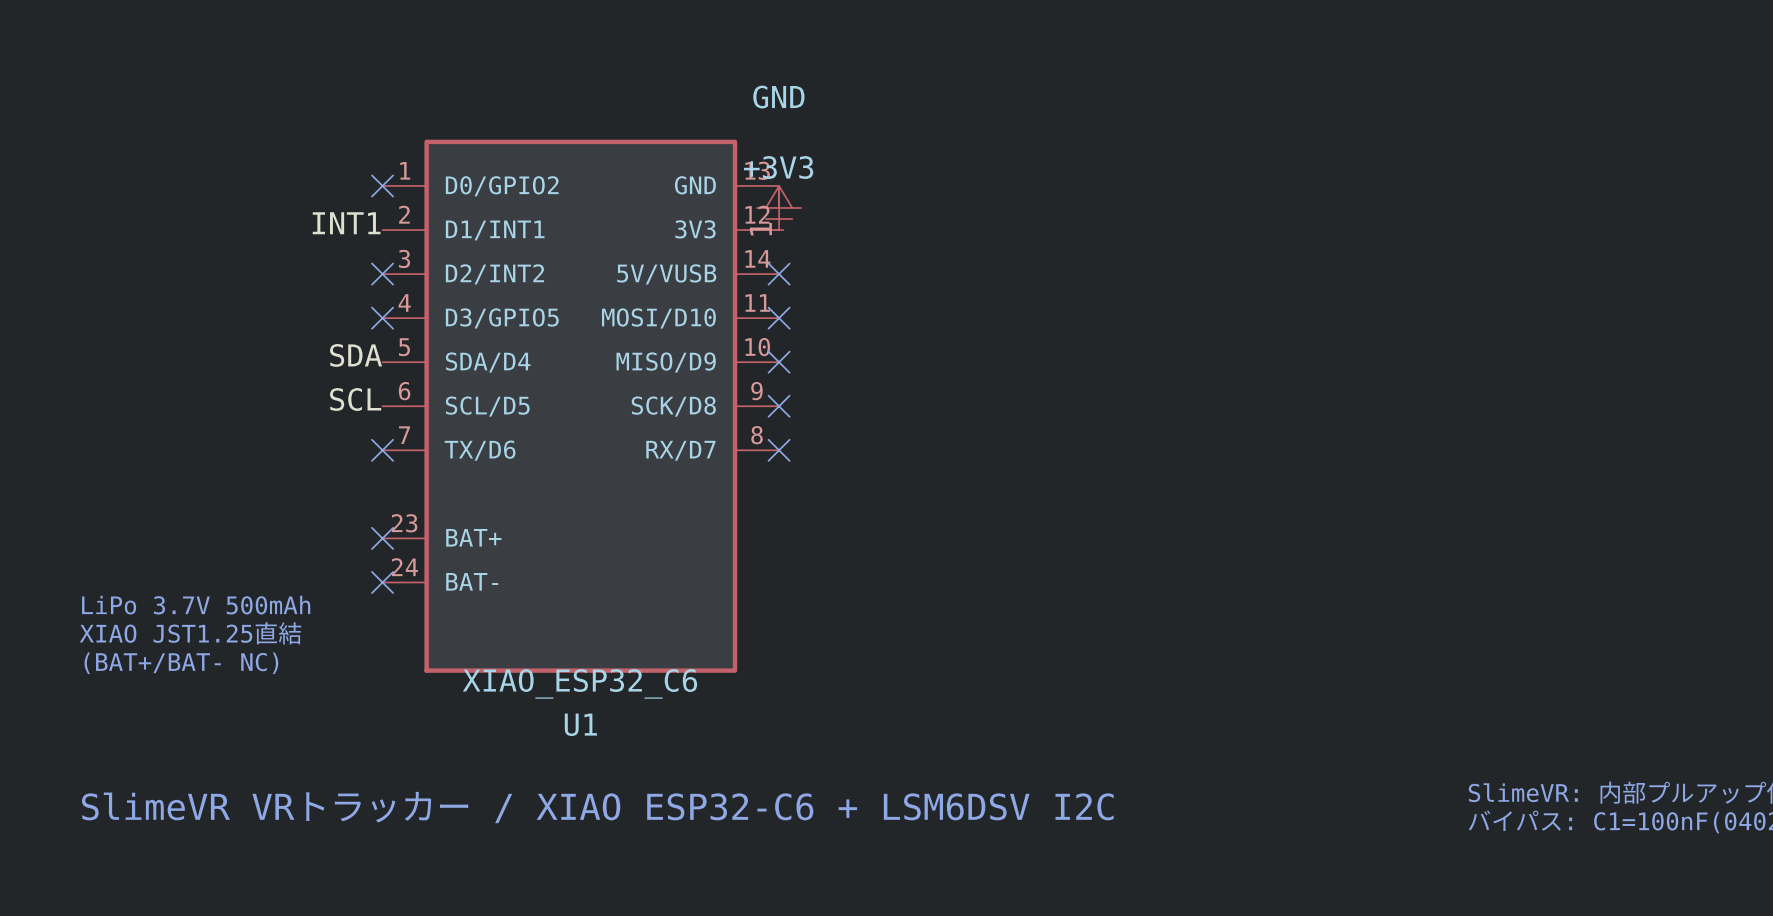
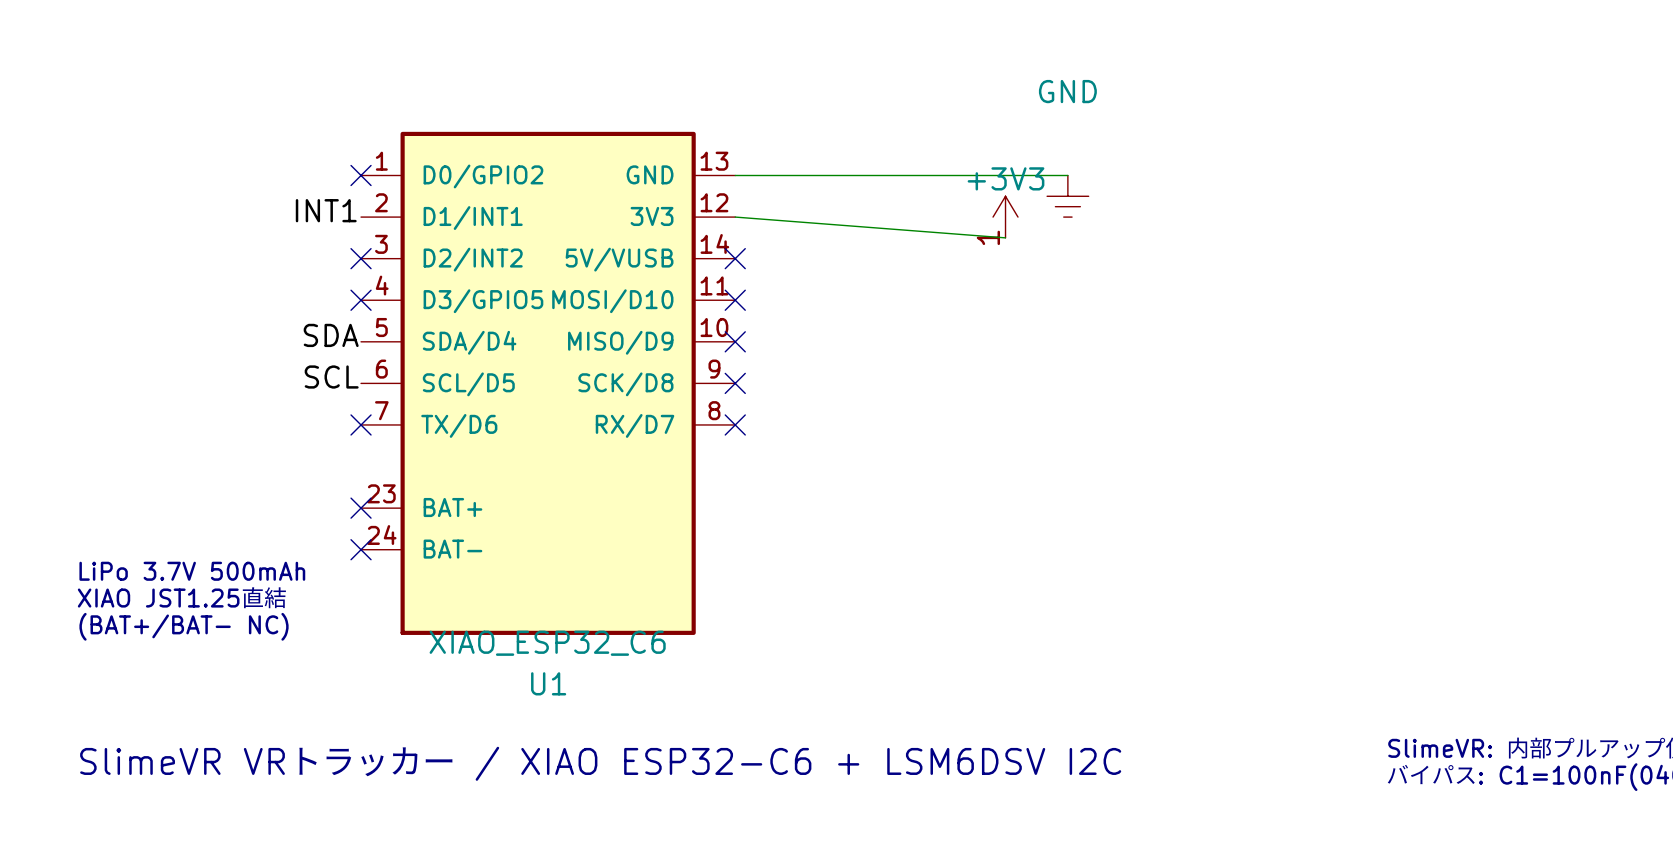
wire: none -> (735, 175) (1067, 175)
power symbol position: +3V3 (779, 207) -> +3V3 (1005, 217)
power symbol position: GND (779, 207) -> GND (1067, 196)
wire: none -> (735, 217) (1005, 237)

